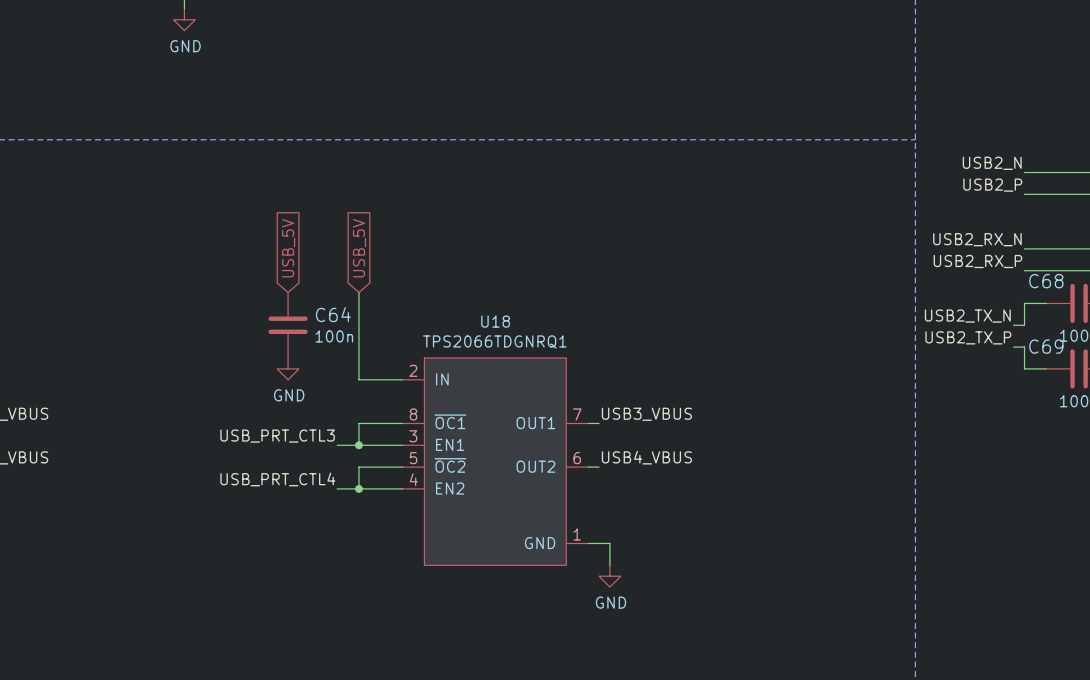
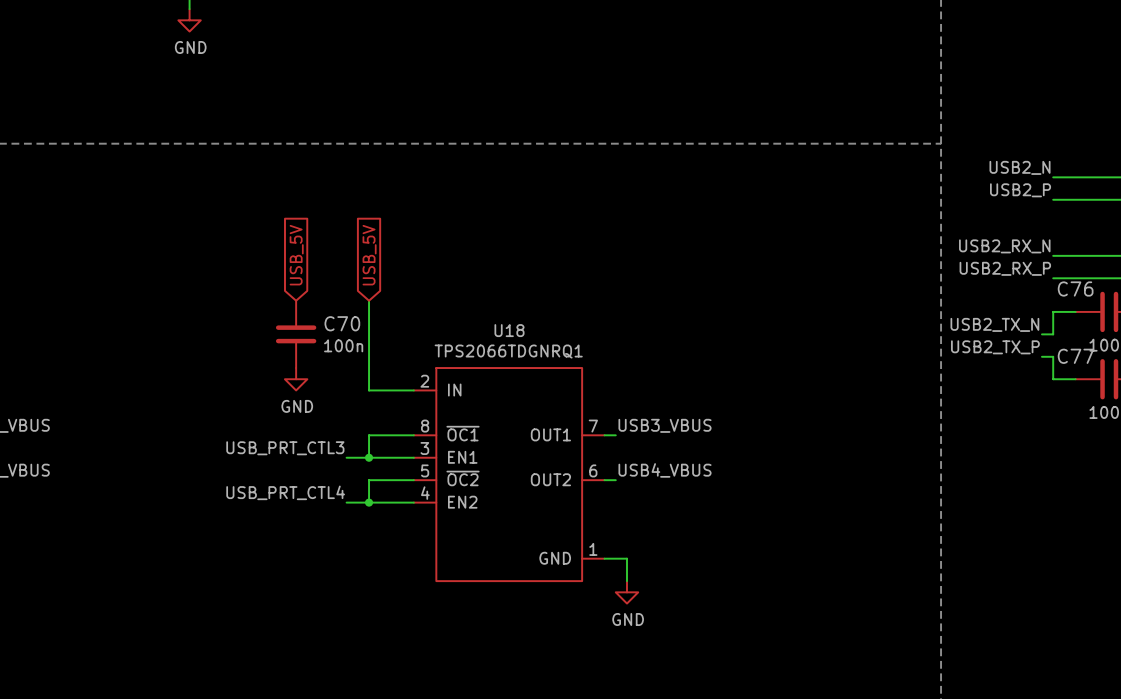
C68 name: C68 (1046, 281) -> C76 (1075, 289)
C64 name: C64 (333, 314) -> C70 (342, 323)
C69 name: C69 (1046, 346) -> C77 (1075, 356)

